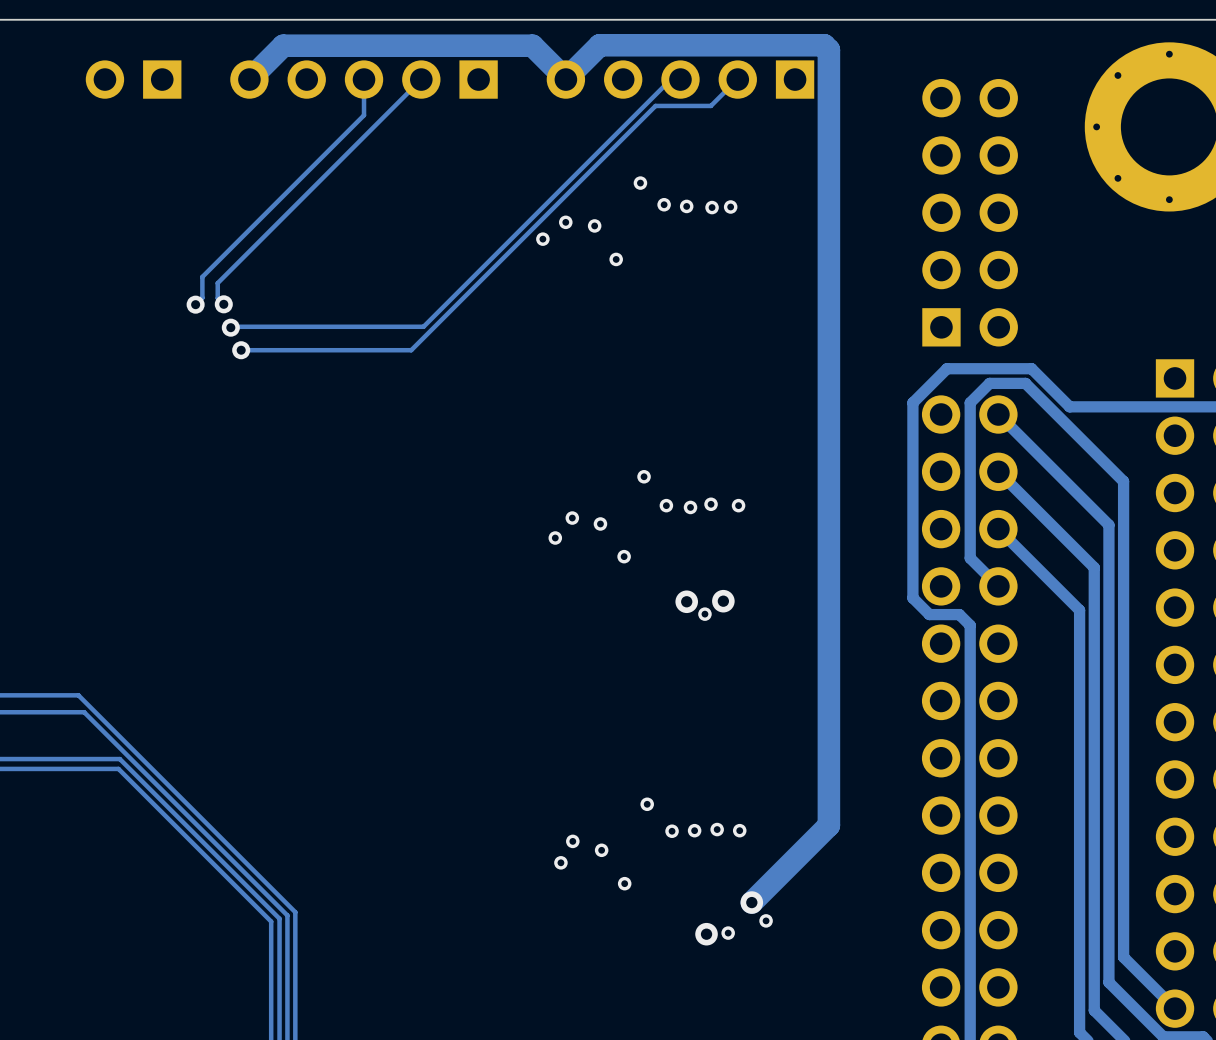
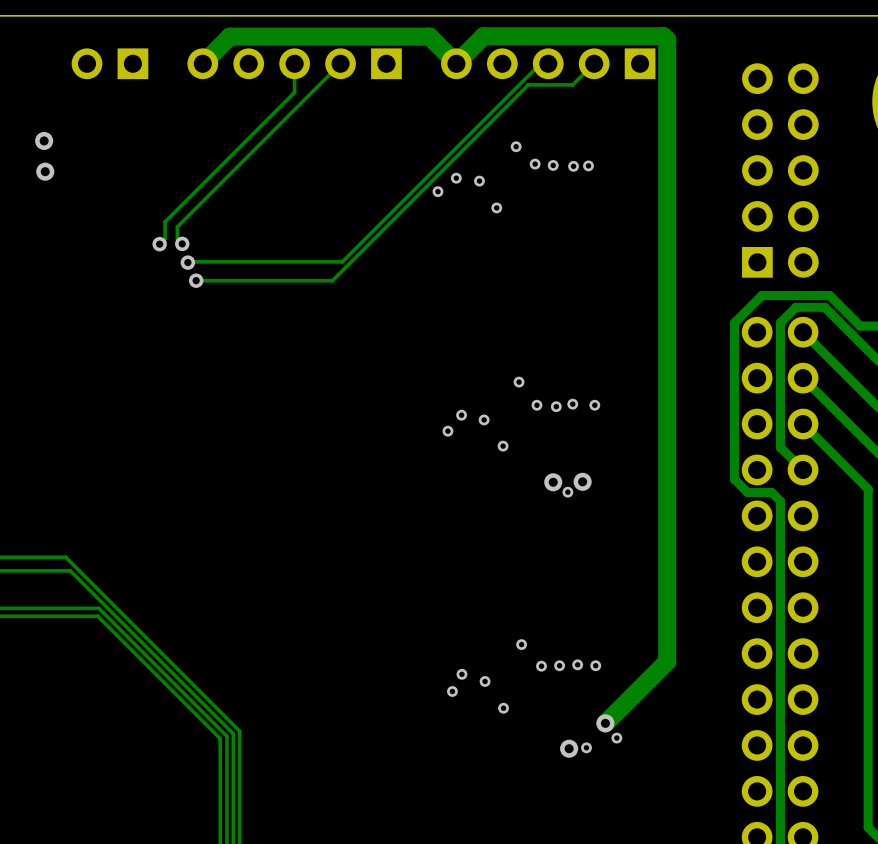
via: none -> (44, 140)
via: none -> (45, 171)

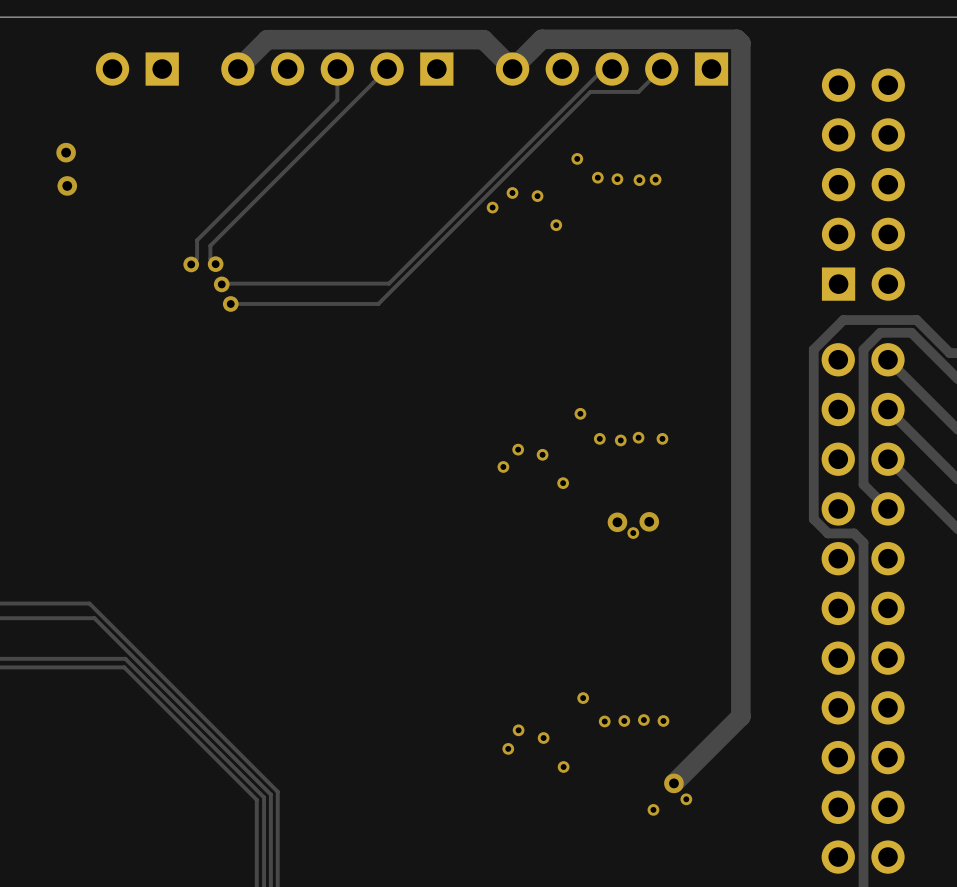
via: (569, 748) -> none

